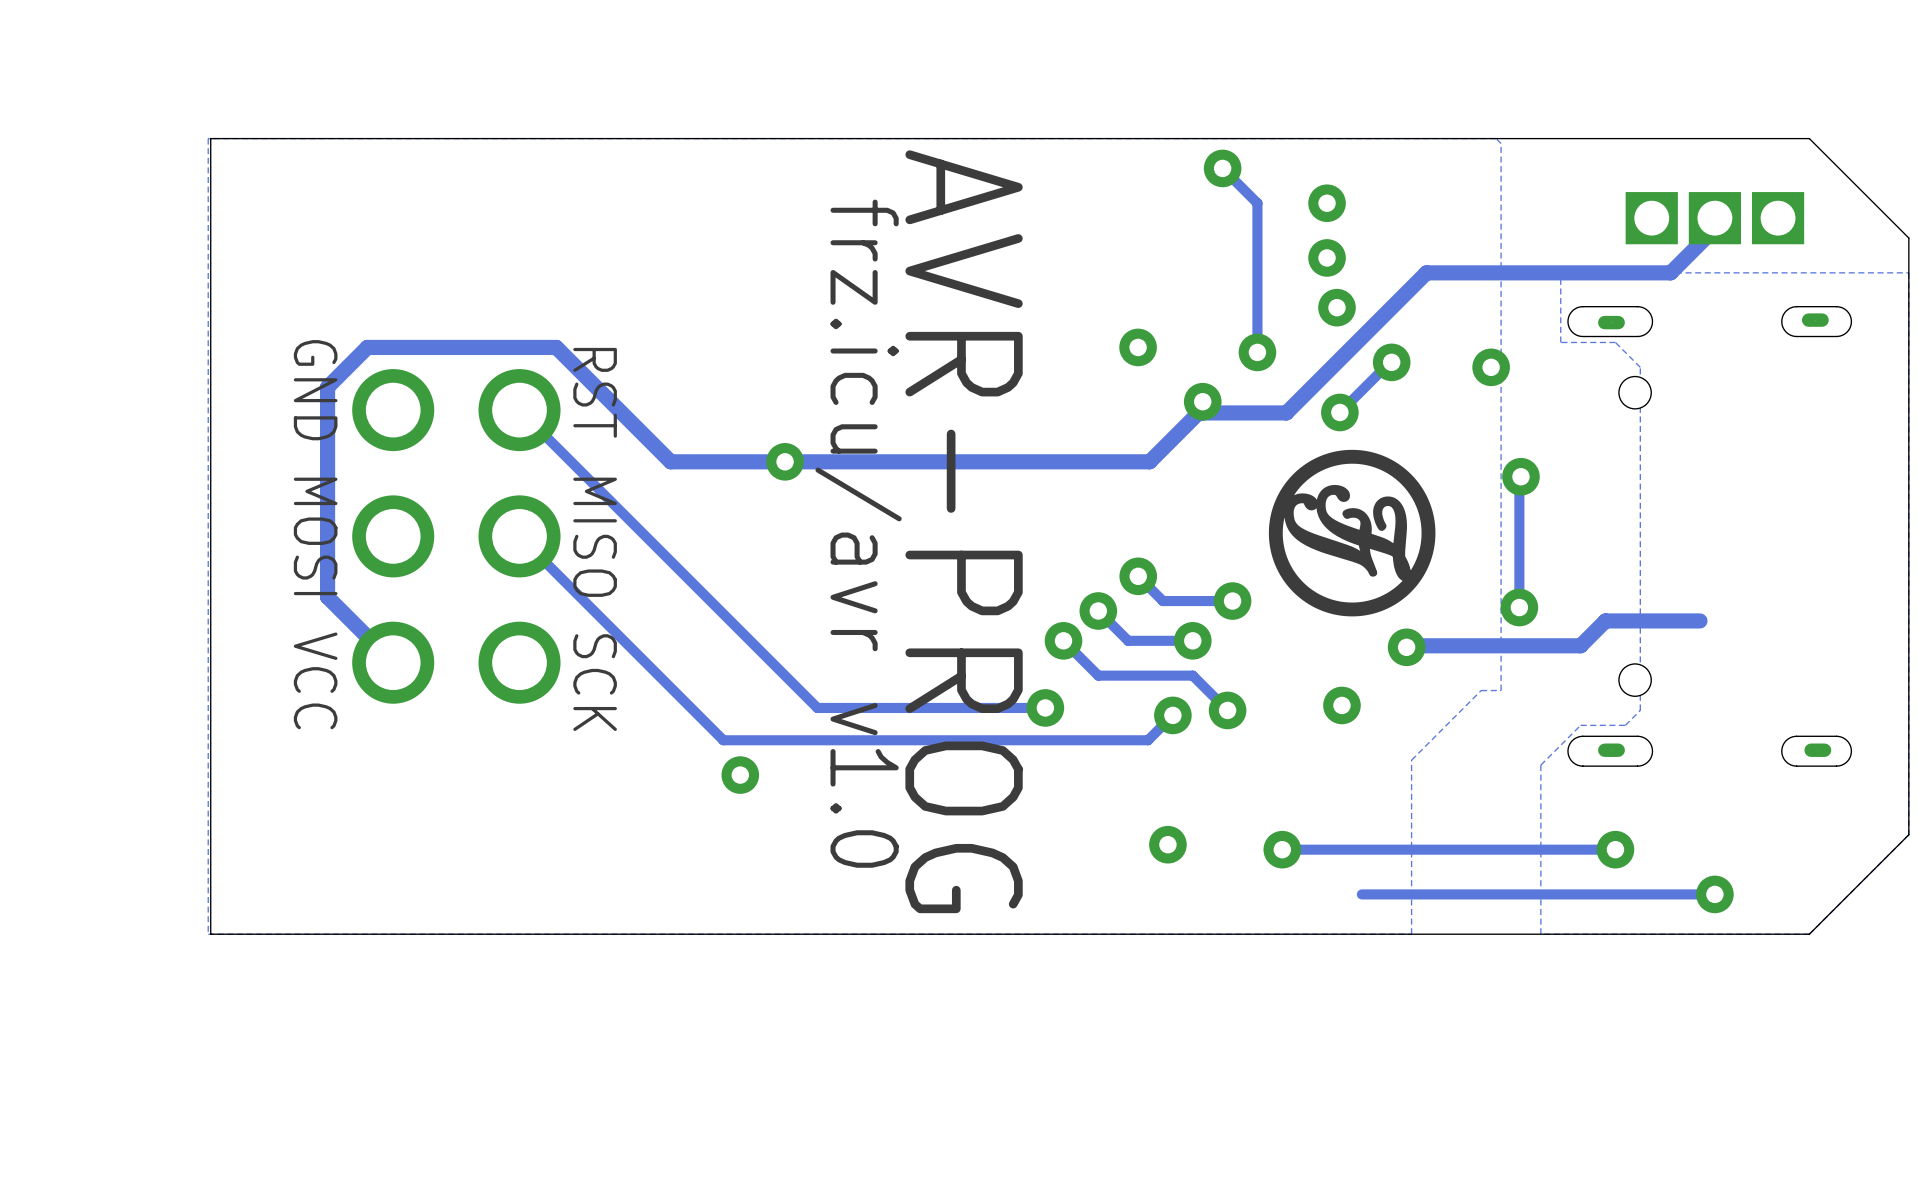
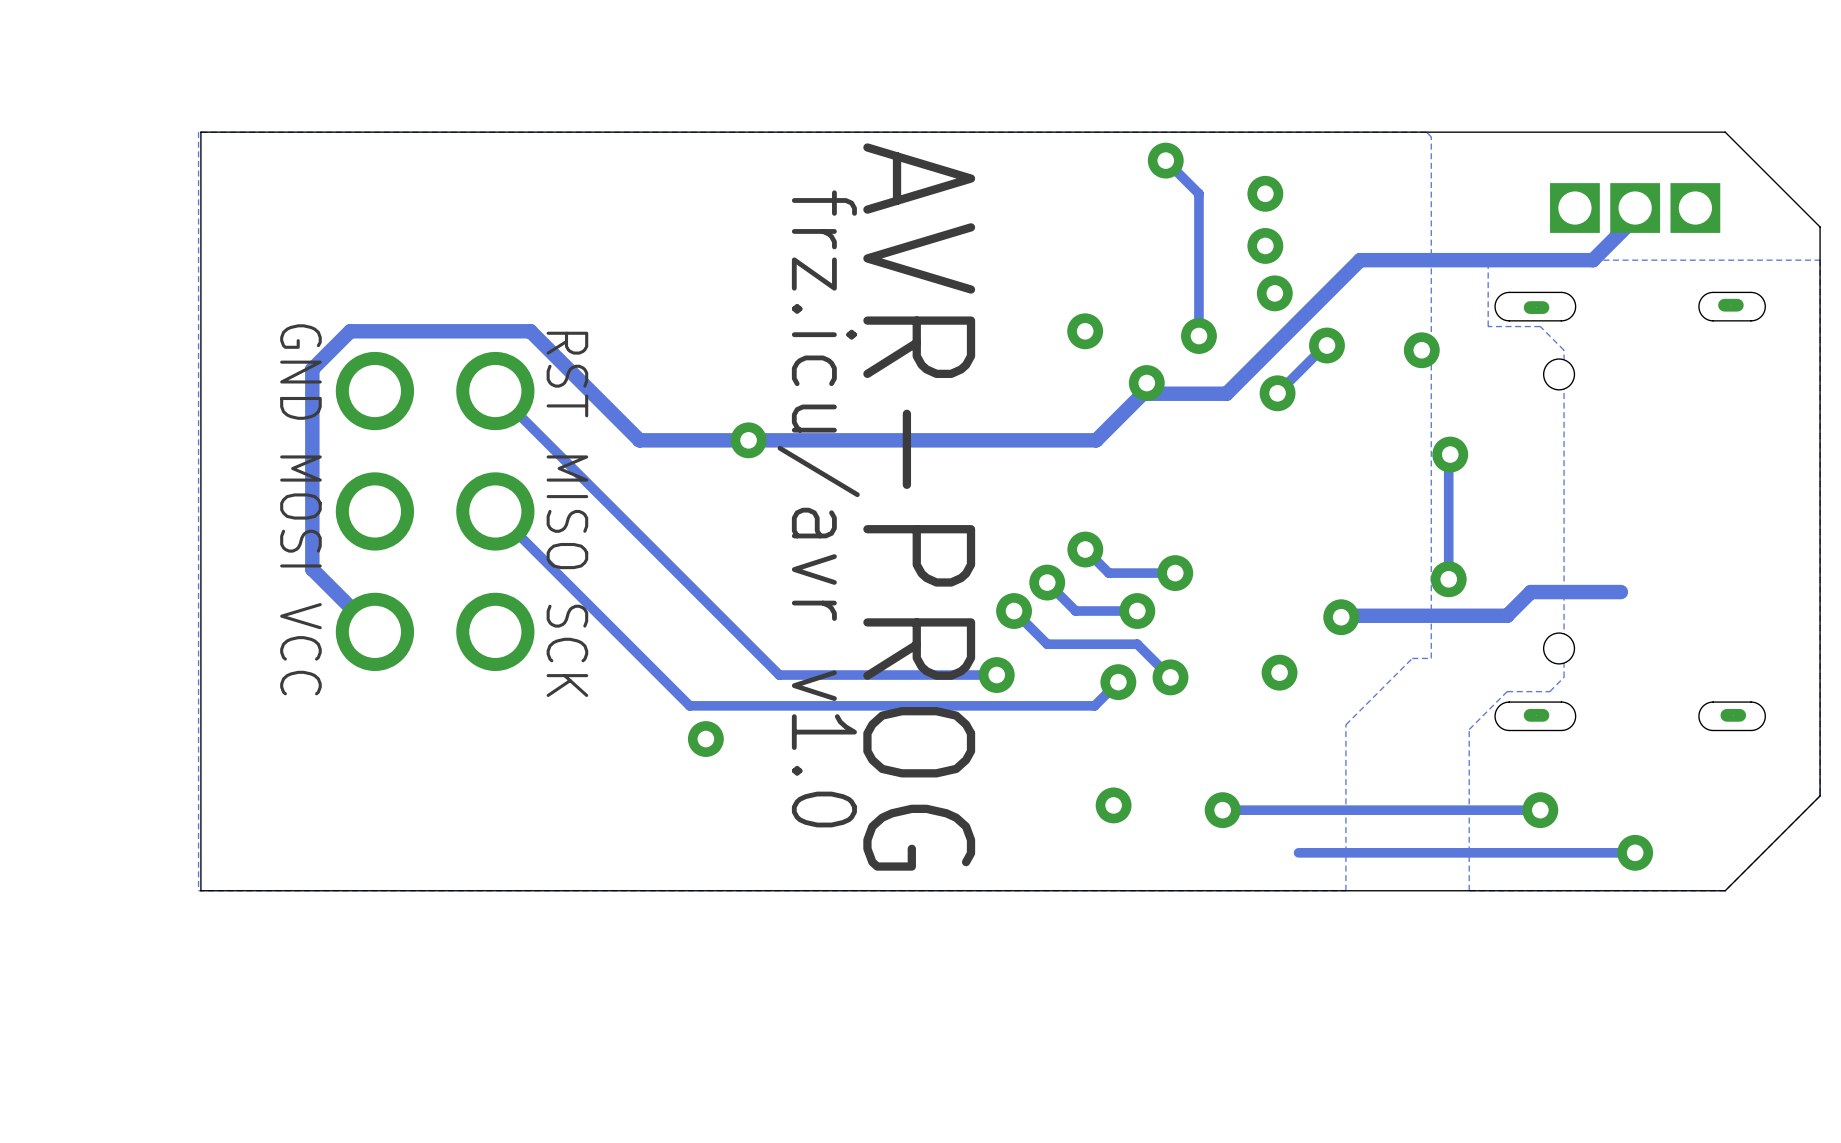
drawing: [1268, 449, 1436, 617] -> none

